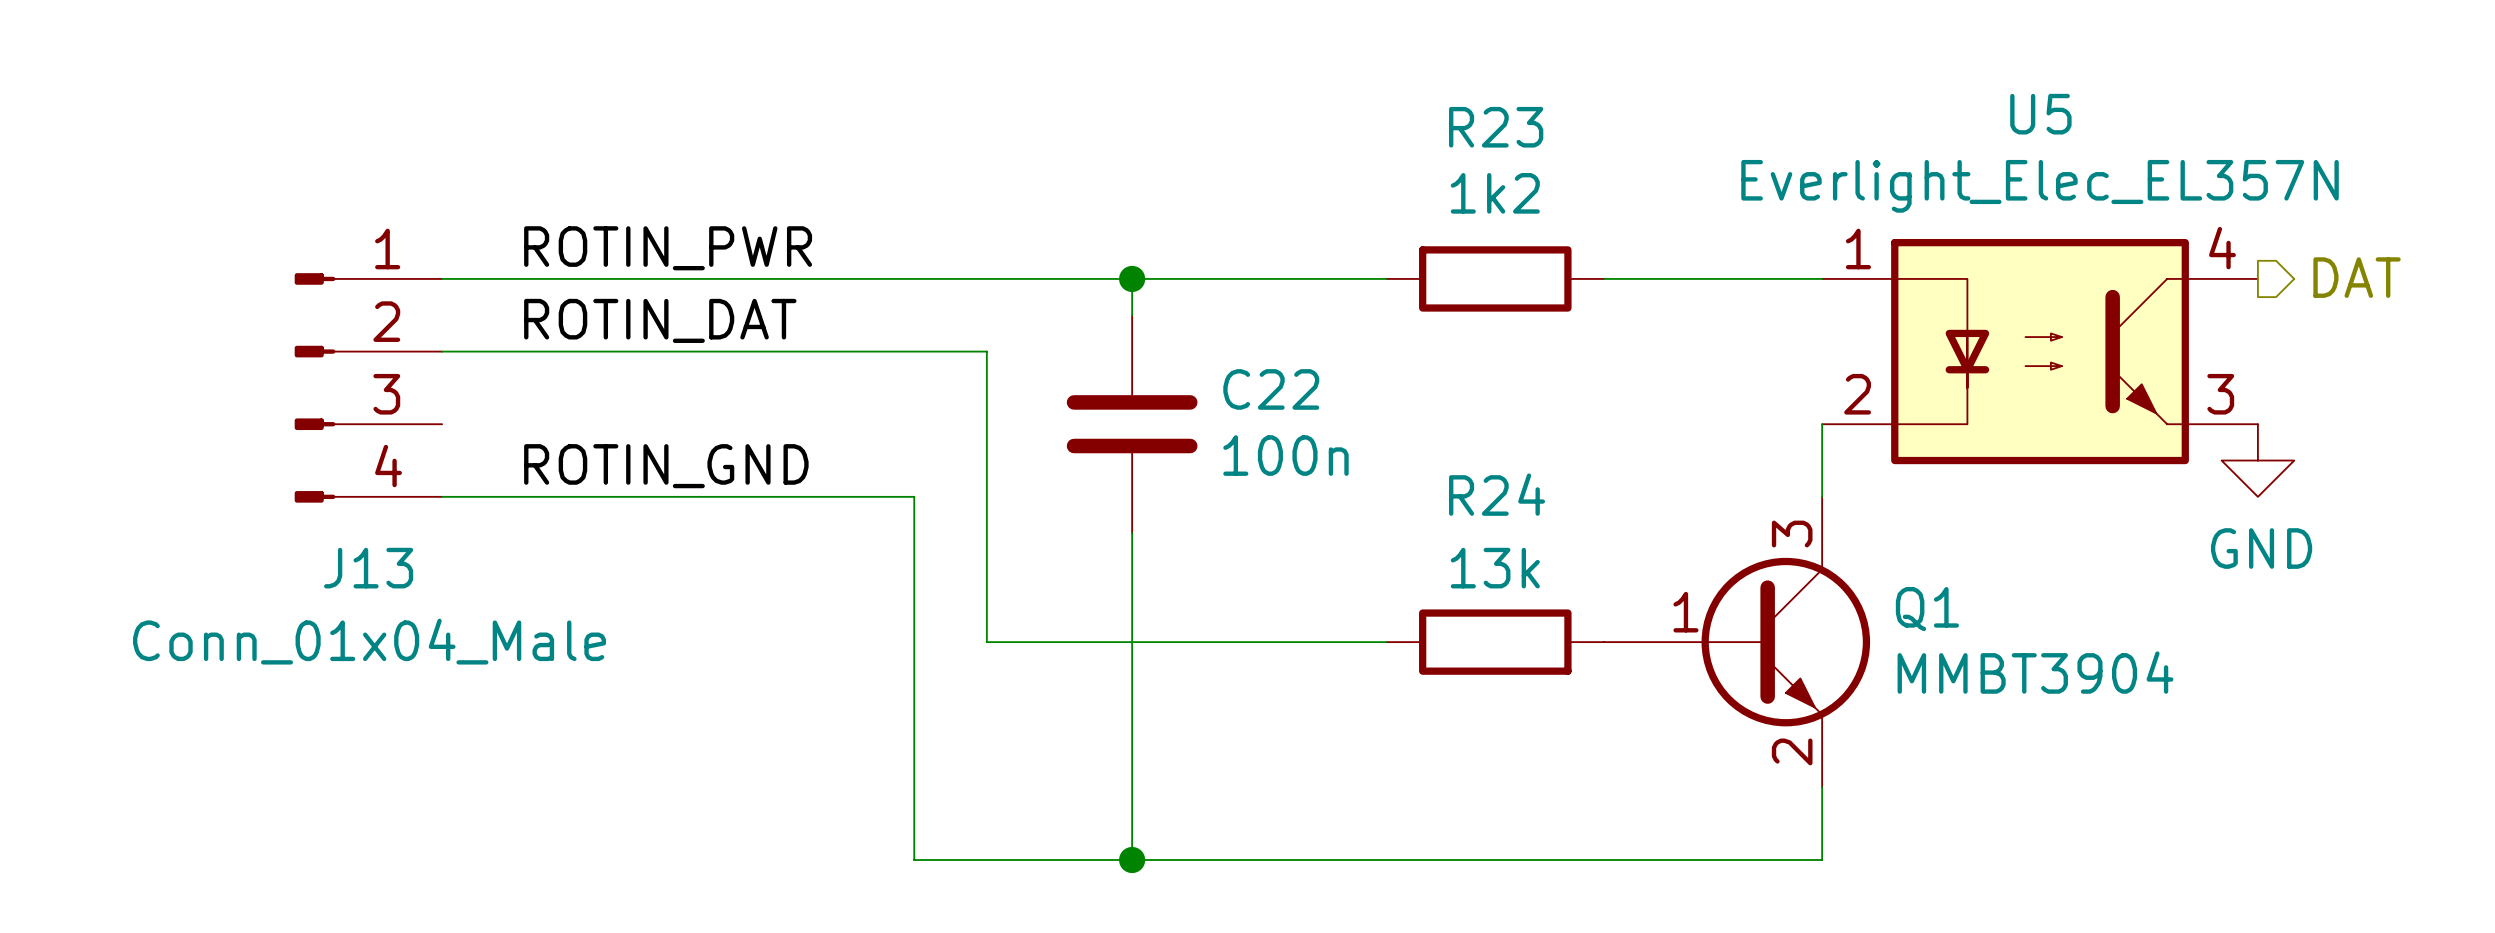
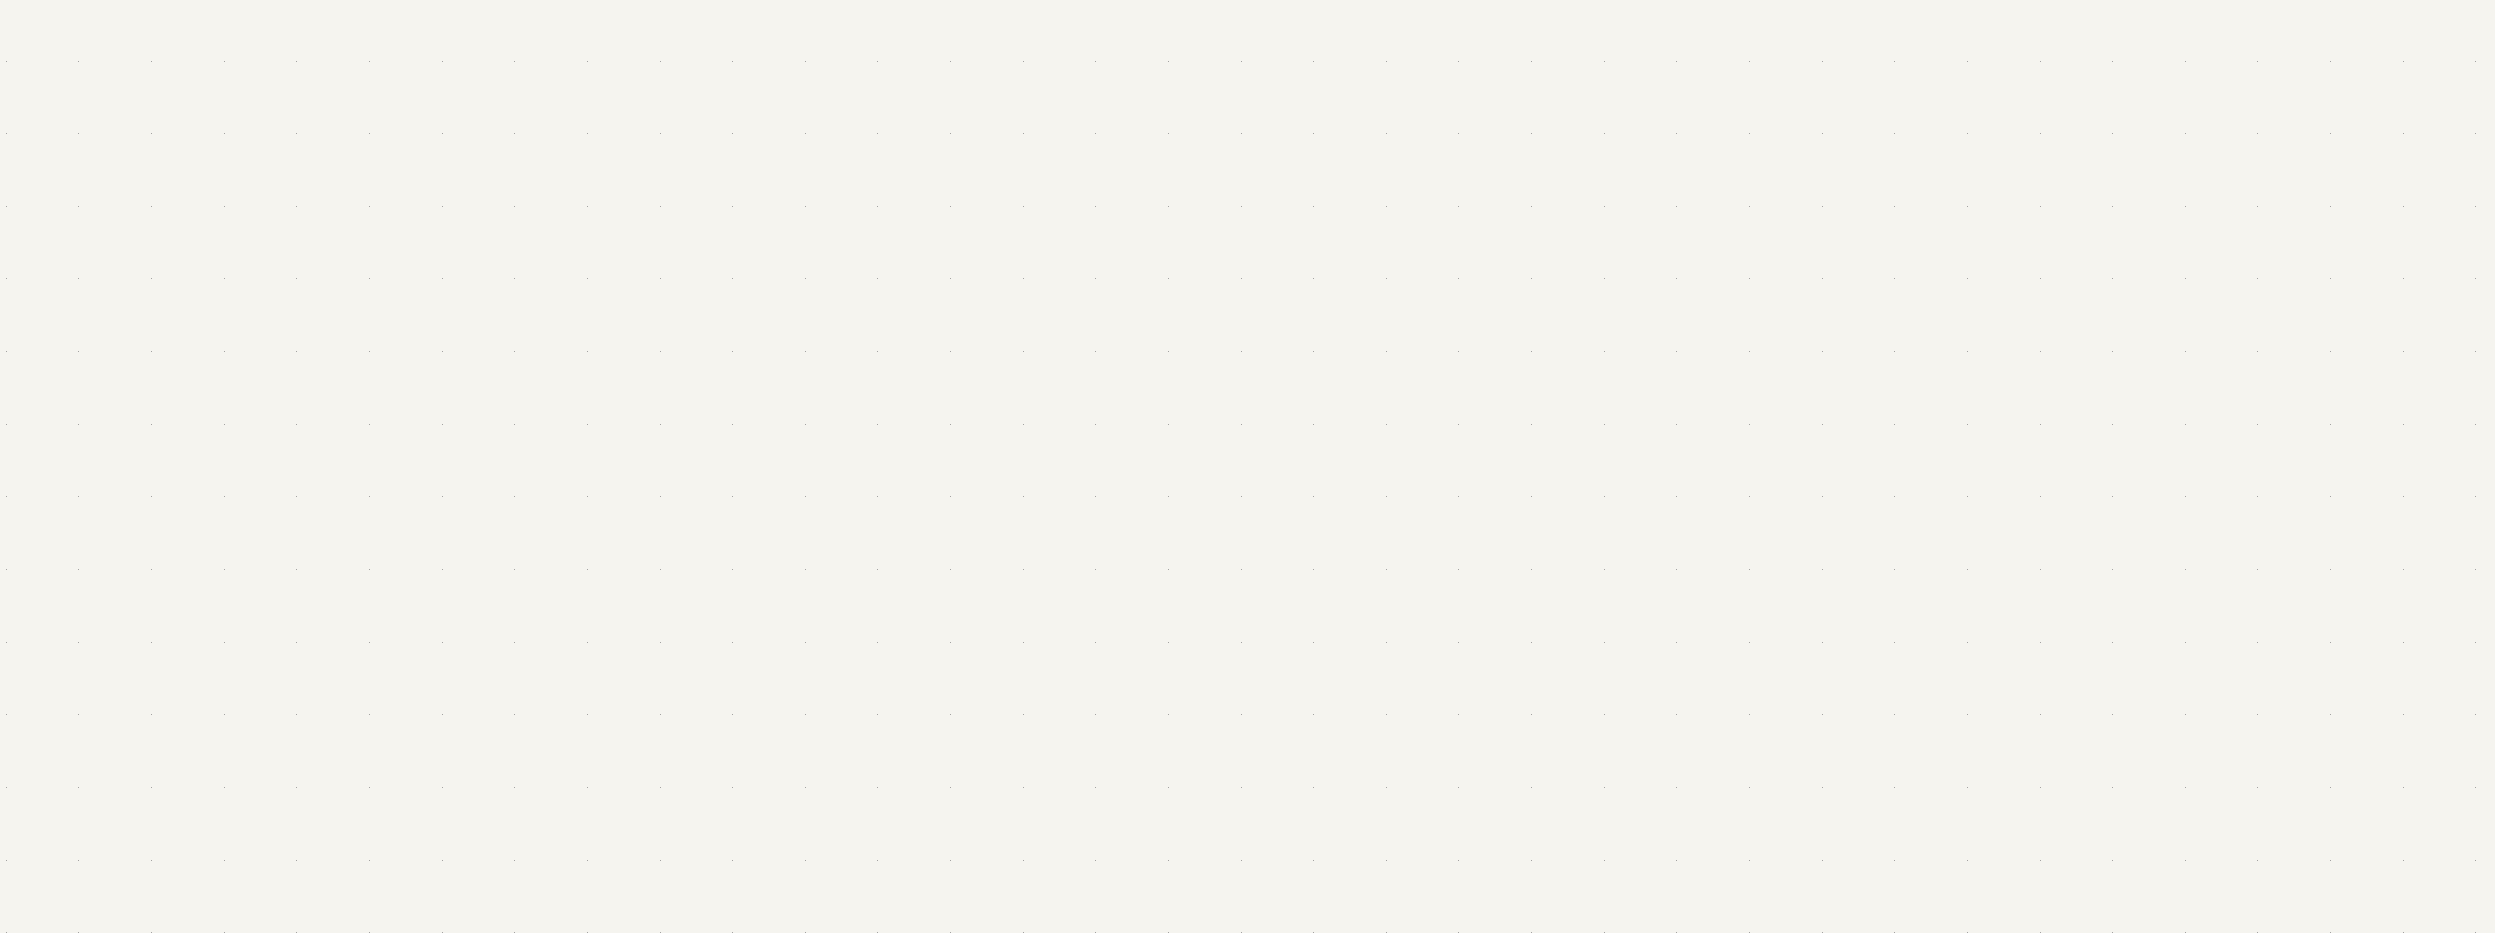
label: ROTIN_PWR (668, 248) -> none
hierarchical label: DAT (2357, 277) -> none
wire: (442, 278) (1386, 278) -> none
wire: (1132, 278) (1132, 315) -> none
junction: (1132, 278) -> none
R23: 1k2 (1495, 278) -> none
wire: (1604, 278) (1822, 278) -> none
label: ROTIN_DAT (660, 320) -> none
wire: (442, 351) (986, 351) (986, 642) (1386, 642) -> none
U5: Everlight_Elec_EL357N (2040, 351) -> none
J13: Conn_01x04_Male (368, 387) -> none
C22: 100n (1132, 424) -> none
wire: (1822, 424) (1822, 496) -> none
power symbol: GND (2257, 460) -> none
label: ROTIN_GND (666, 466) -> none
wire: (442, 496) (914, 496) (914, 860) (1822, 860) (1822, 787) -> none
wire: (1132, 533) (1132, 860) -> none
R24: 13k (1495, 642) -> none
Q1: MMBT3904 (1737, 642) -> none
junction: (1132, 860) -> none

